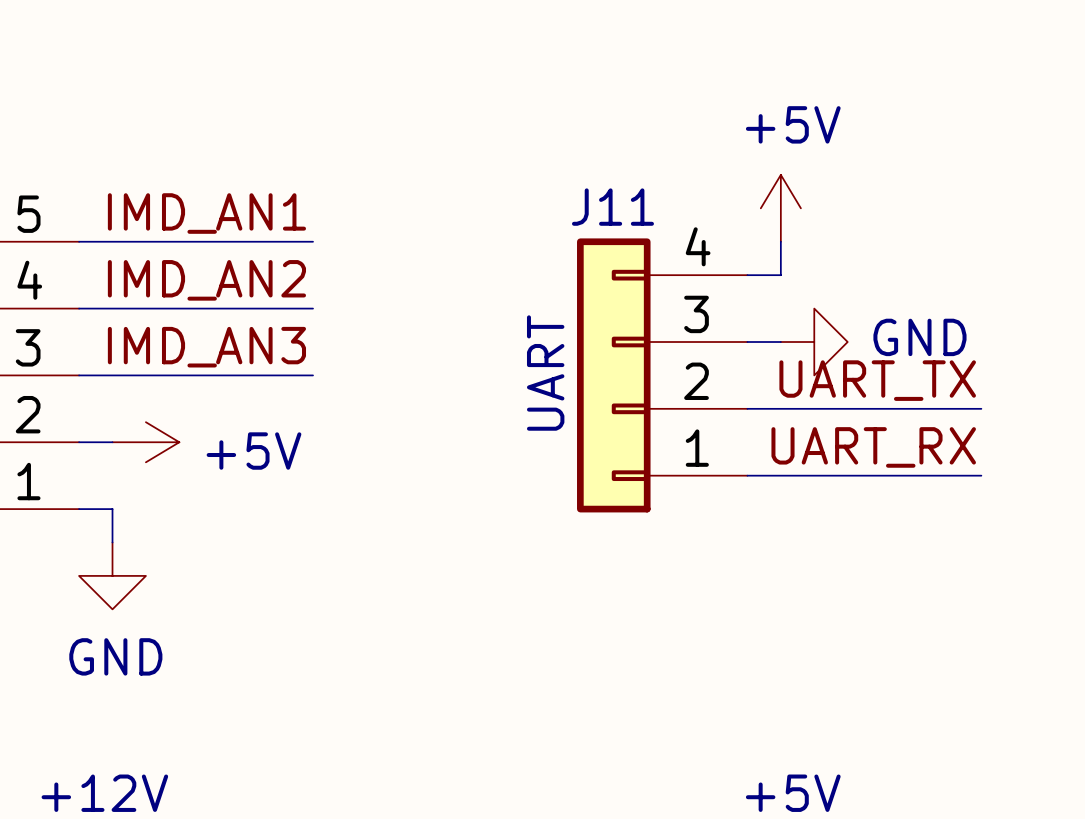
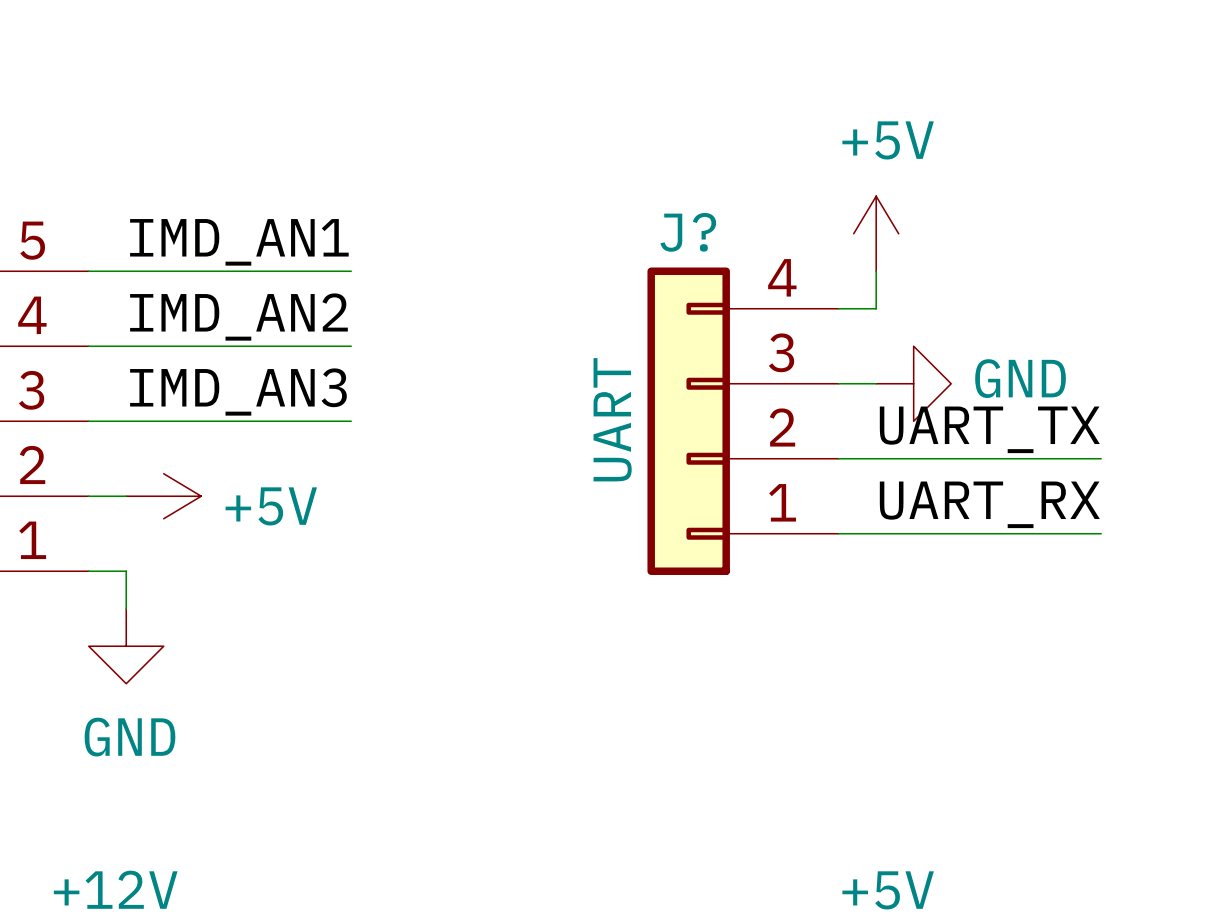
J11 name: J11 (612, 207) -> J? (688, 232)

